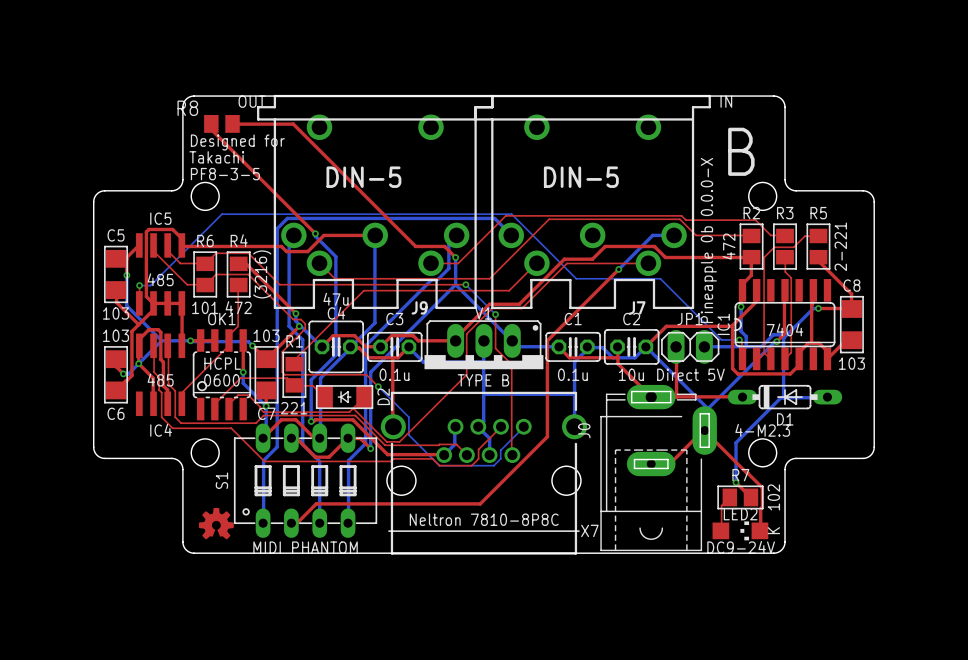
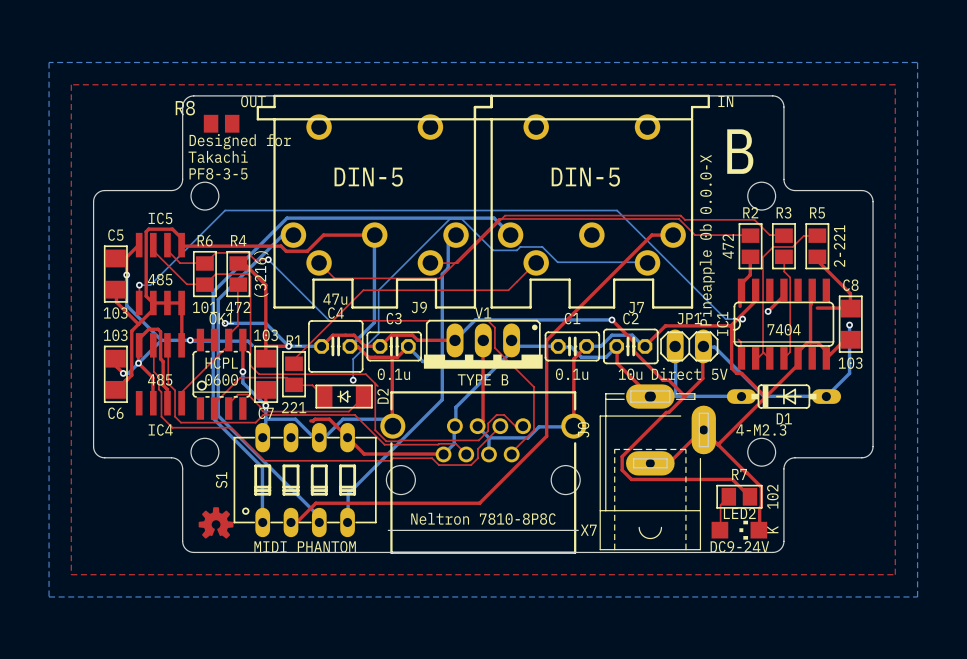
bottom zone outline: none -> (49, 62) (917, 62) (917, 596) (49, 596) (49, 62)
top zone outline: none -> (71, 84) (895, 84) (895, 574) (71, 574) (71, 84)
top track: (211, 123) (211, 130) (315, 233) -> none
top track: (232, 123) (293, 124) (415, 246) (444, 246) (455, 257) -> none
bottom track: (222, 214) (511, 214) (576, 278) (660, 278) (721, 339) (739, 339) -> (221, 213) (225, 210) (617, 210) (725, 319) (742, 319)
top track: (549, 219) (489, 278) (440, 278) -> (548, 218) (499, 218) (439, 278)
bottom track: (277, 228) (277, 446) (263, 460) (263, 523) -> (276, 228) (213, 291) (213, 418) (262, 467) (262, 522)
bottom track: (315, 233) (315, 236) (335, 256) (335, 355) (311, 379) (311, 421) -> none
via: (315, 233) -> none
bottom track: (293, 235) (289, 239) (289, 326) (302, 339) (302, 444) (319, 461) (319, 517) -> (292, 235) (282, 235) (218, 299) (218, 415) (319, 516)
top track: none -> (673, 235) (651, 235) (617, 269)
bottom track: (674, 235) (652, 235) (618, 269) -> none
bottom track: (455, 257) (455, 284) -> none
via: (455, 257) -> none
top track: (751, 257) (665, 257) (654, 246) (605, 246) (592, 259) (564, 259) (519, 304) (489, 304) (454, 339) (455, 340) -> none
top track: (255, 260) (279, 284) (465, 284) -> (254, 259) (268, 259)
bottom track: none -> (268, 259) (329, 320)
via: none -> (268, 259)
top track: (648, 263) (566, 263) (521, 308) (492, 308) (466, 333) (466, 374) (400, 441) -> (522, 426) (515, 426) (504, 414) (496, 414) (488, 423) (488, 431) (478, 440) (399, 440)
bottom track: none -> (647, 262) (557, 262) (542, 246) (520, 246) (516, 250) (493, 250) (461, 218) (449, 218) (378, 290) (378, 333) (353, 358) (353, 380)
top track: (244, 264) (295, 313) -> (244, 263) (265, 285) (266, 358)
via position: (618, 269) -> (612, 319)
bottom track: (442, 274) (437, 279) (431, 279) (365, 345) (365, 443) (348, 460) (348, 494) -> (442, 274) (442, 399) (348, 493)
top track: (250, 277) (293, 319) (301, 319) (305, 323) (305, 328) (282, 351) (282, 372) (284, 374) -> (250, 276) (250, 365) (259, 374) (284, 374)
bottom track: (455, 284) (518, 346) -> (454, 426) (455, 407) (516, 347) (511, 340) (517, 346)
bottom track: (455, 284) (370, 372) (370, 448) -> none
bottom track: (465, 284) (495, 314) -> none
via: (465, 284) -> none
top track: (784, 296) (784, 333) (776, 341) -> (783, 296) (768, 311)
bottom track: (741, 306) (741, 331) (746, 336) (746, 346) -> none
via: (741, 306) -> none
bottom track: (818, 308) (813, 308) (783, 338) -> none
via: (818, 308) -> none
via: none -> (768, 311)
bottom track: (295, 313) (295, 321) (321, 346) -> (225, 323) (265, 323) (288, 346) (320, 346)
via: (295, 313) -> none
top track: (495, 314) (495, 328) -> (329, 320) (488, 320) (494, 327)
via: (495, 314) -> none
via: none -> (742, 319)
top track: none -> (612, 319) (634, 342) (634, 351) (662, 380) (668, 380) (684, 396)
bottom track: none -> (612, 319) (475, 319) (455, 340)
via: none -> (225, 323)
via: none -> (849, 325)
top track: (299, 326) (266, 359) (252, 345) -> none
via: (299, 326) -> none
bottom track: (783, 338) (780, 334) (773, 334) (761, 346) (704, 346) -> (849, 325) (849, 373) (826, 396) (763, 396) (714, 347) (703, 346)
bottom track: (783, 338) (783, 397) -> none
via: (739, 339) -> none
top track: none -> (483, 340) (483, 420) (477, 426)
bottom track: (483, 340) (483, 421) (478, 426) -> none
bottom track: (776, 341) (775, 341) (705, 411) (704, 430) (707, 407) (646, 347) (634, 357) (612, 357) (602, 347) (587, 346) (587, 349) (574, 362) (574, 426) -> (488, 437) (528, 437) (539, 426) (573, 426)
via: (776, 341) -> none
via: (252, 345) -> none
top track: none -> (265, 346) (288, 346)
via: none -> (288, 346)
bottom track: (350, 346) (320, 378) (319, 438) -> none
top track: (559, 346) (569, 357) (617, 357) -> none
bottom track: none -> (558, 346) (571, 347) (581, 357) (606, 357) (616, 346)
top track: none -> (586, 346) (573, 358) (573, 426)
bottom track: none -> (586, 346) (600, 346) (612, 335) (632, 335) (644, 346)
top track: (676, 346) (676, 396) -> none
bottom track: none -> (675, 346) (675, 396)
top track: none -> (703, 346) (702, 378) (622, 456) (622, 470) (631, 479) (732, 479) (735, 482)
top track: (511, 364) (512, 455) -> (511, 364) (533, 386) (533, 430) (511, 454)
top track: (742, 373) (790, 373) -> (741, 373) (765, 397)
top track: none -> (789, 373) (718, 444)
bottom track: (378, 386) (408, 417) (408, 435) (439, 465) (493, 465) (500, 458) (500, 450) (523, 426) -> none
via position: (378, 386) -> (353, 380)
bottom track: (483, 394) (574, 394) -> none
top track: (651, 397) (742, 397) -> none
bottom track: none -> (650, 396) (741, 396)
bottom track: (827, 397) (781, 397) (736, 442) (736, 482) -> none
top track: (353, 408) (375, 430) -> (375, 383) (375, 430)
bottom track: none -> (265, 419) (295, 419) (313, 437) (319, 437) (325, 437) (343, 419) (385, 419) (392, 426)
top track: (329, 419) (352, 419) (387, 454) -> (329, 419) (364, 454) (387, 454)
via: (311, 421) -> none
top track: (263, 438) (281, 419) (295, 419) (313, 437) (319, 438) -> none
top track: (291, 438) (296, 438) (315, 457) (329, 457) (348, 438) (360, 438) (370, 448) -> none
via: (370, 448) -> none
via: (736, 482) -> none

